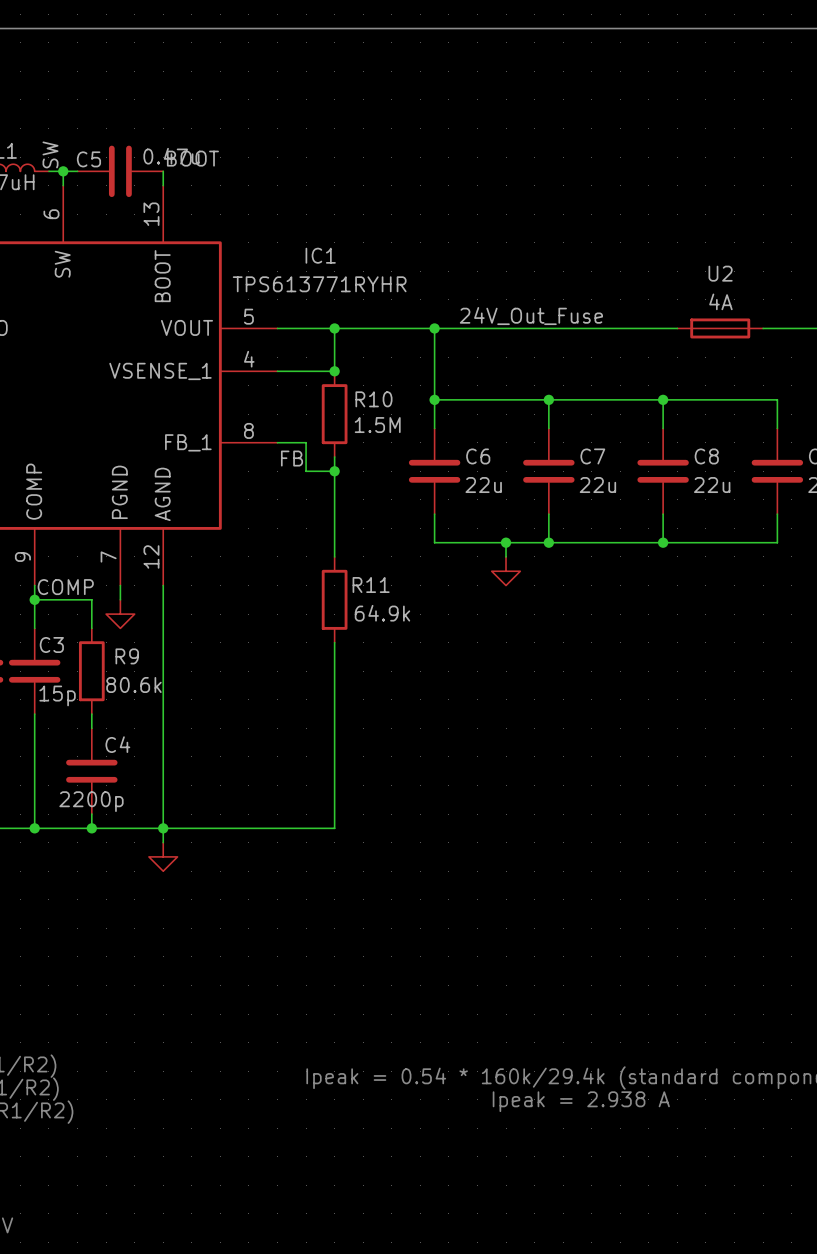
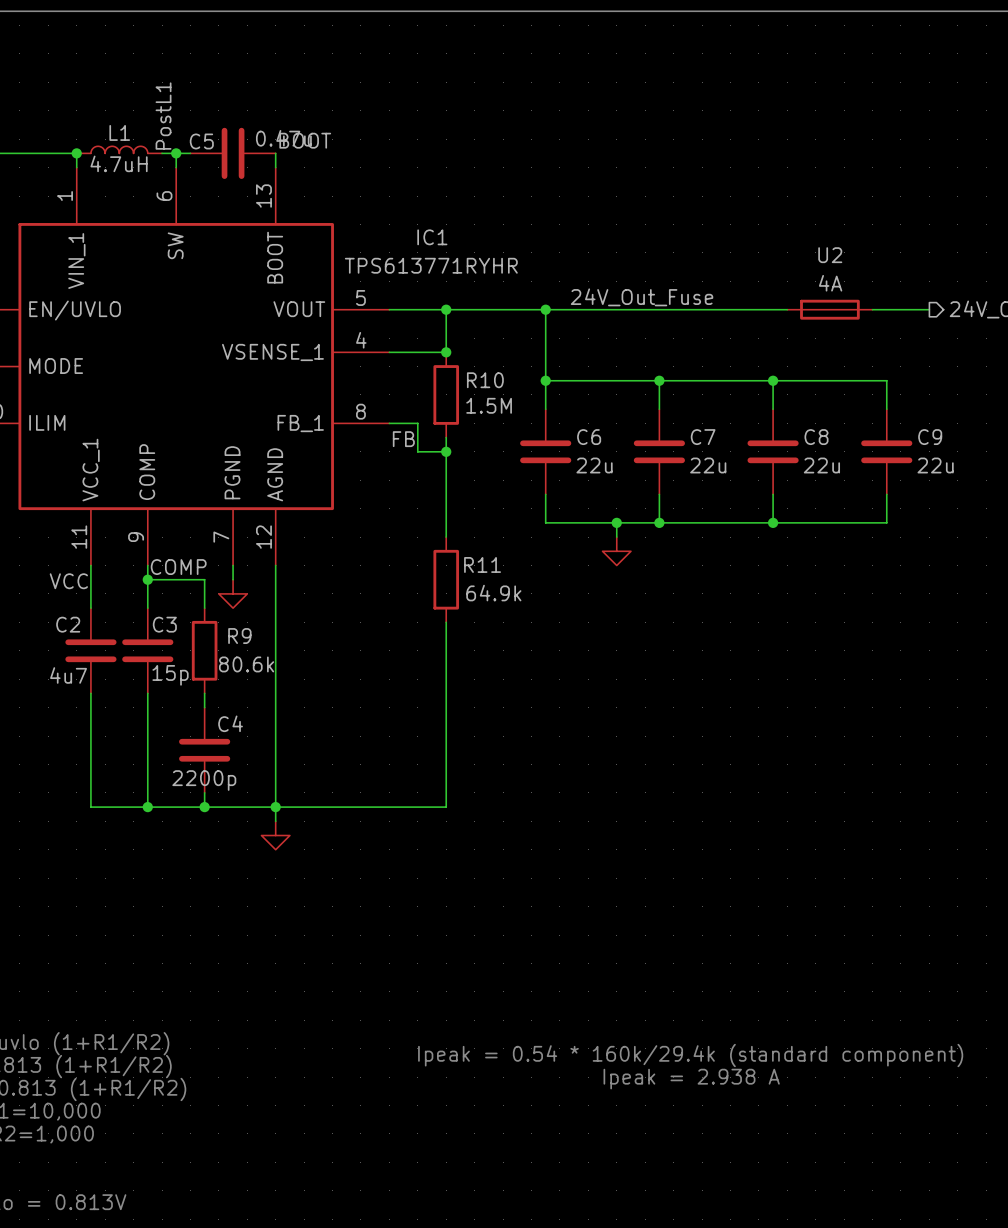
label: SW (50, 154) -> PostL1 (163, 116)

